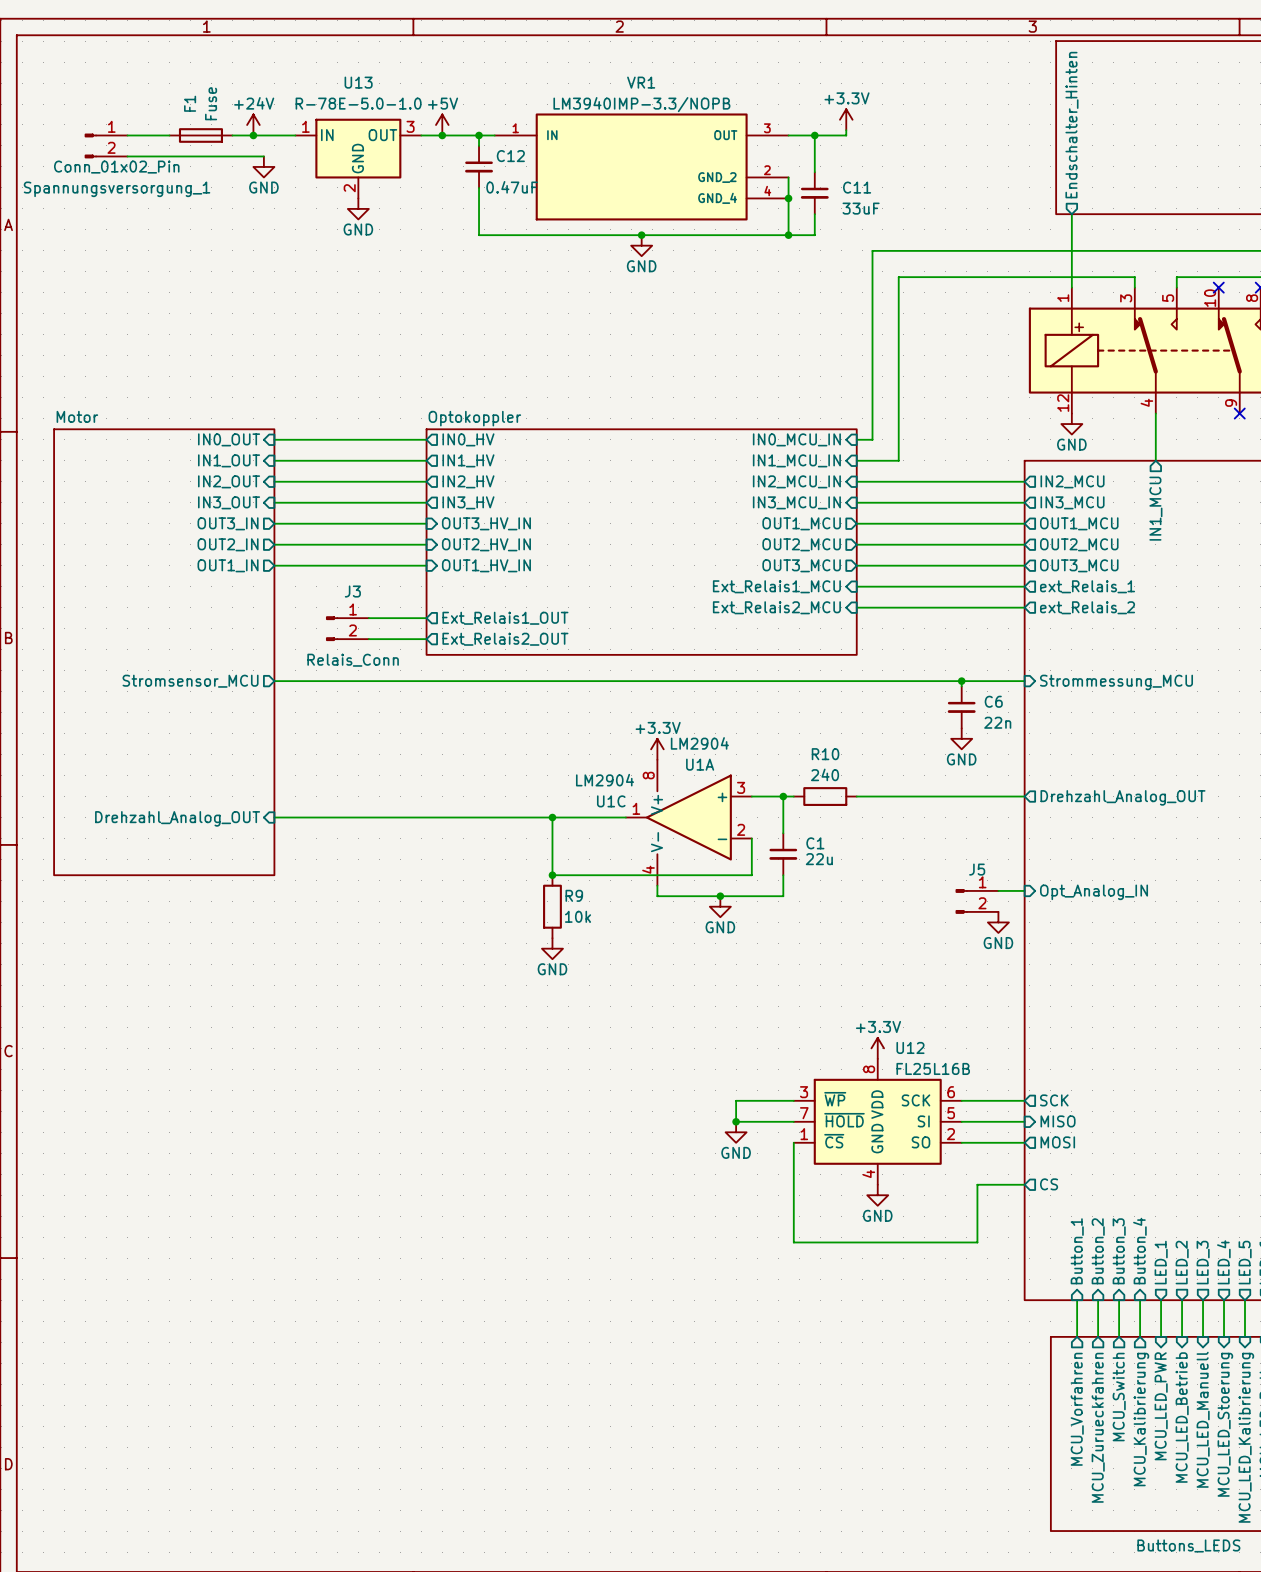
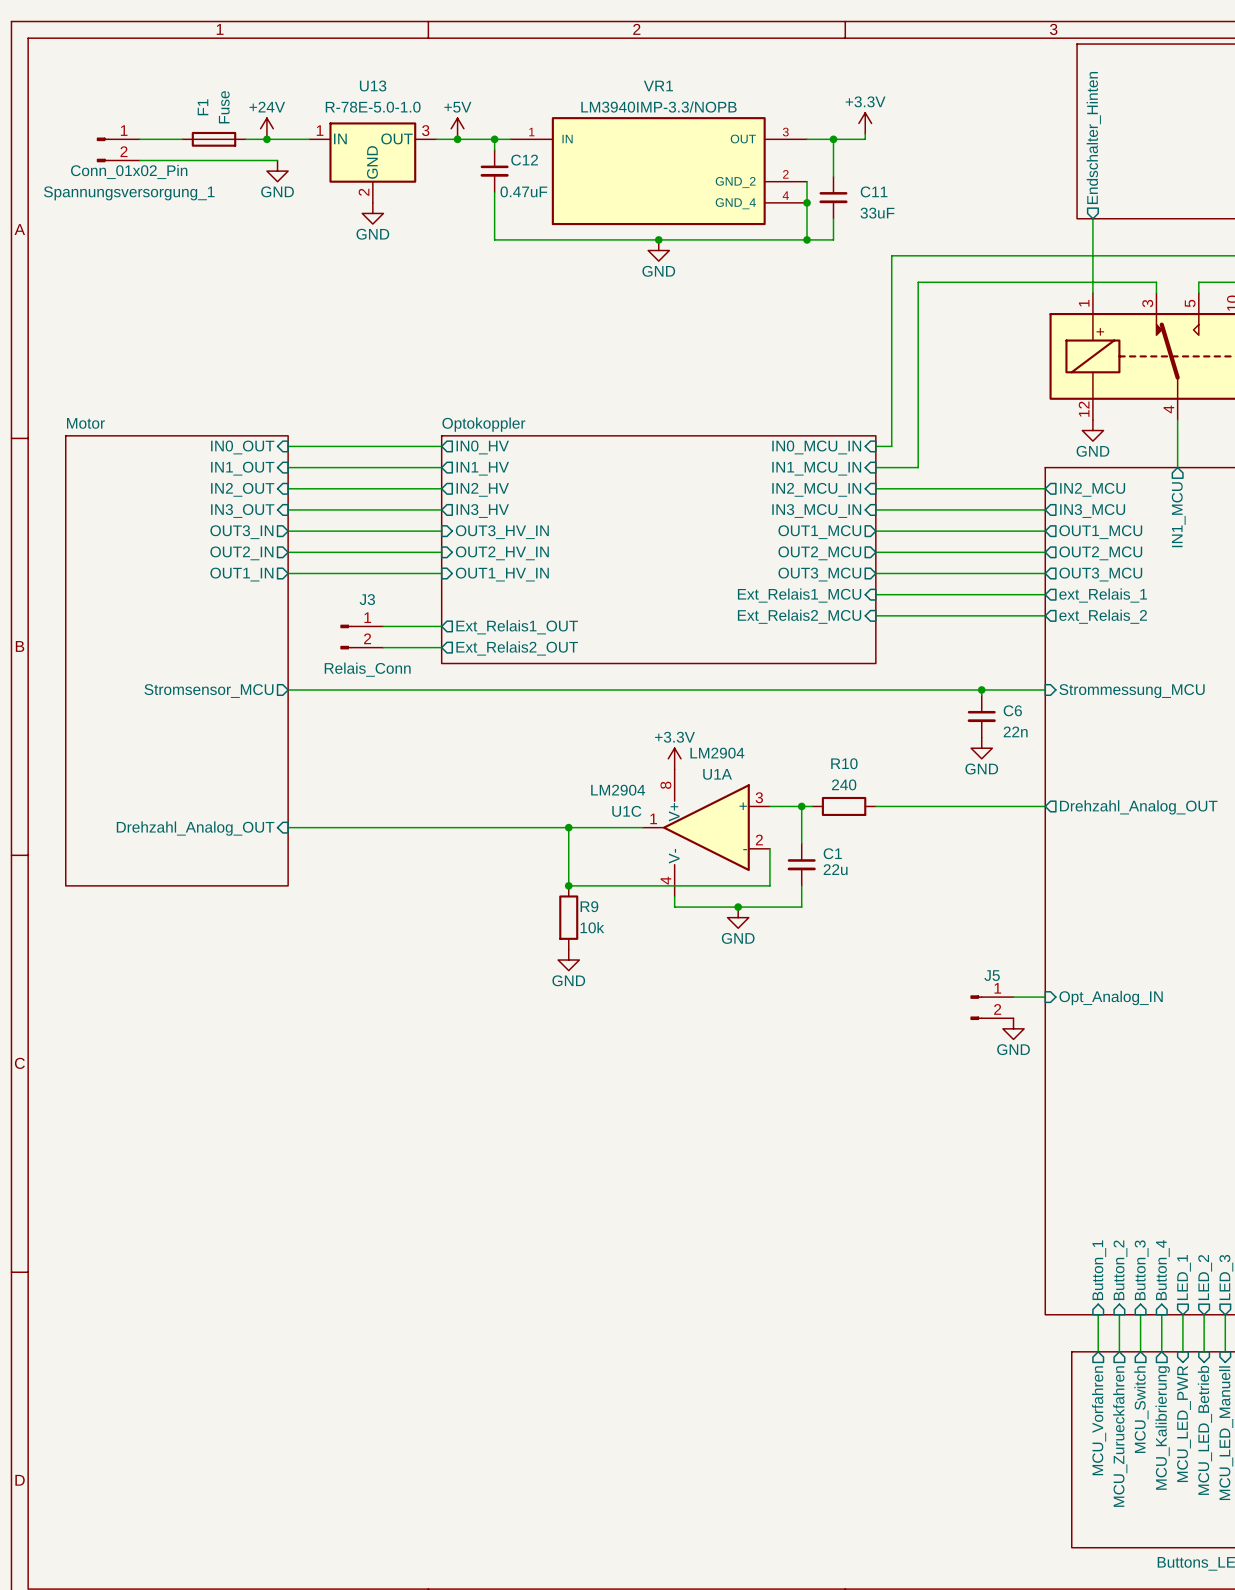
wire: (998, 890) (1024, 890) -> none
sheet pin position: Opt_Analog_IN (1094, 892) -> Opt_Analog_IN (1111, 998)
J5 position: (977, 901) -> (992, 1007)
power symbol position: GND (998, 922) -> GND (1013, 1028)
wire: none -> (1013, 997) (1045, 997)
power symbol: +3.3V (877, 1048) -> none
wire: (793, 1100) (736, 1100) (736, 1121) (793, 1121) -> none
wire: (961, 1100) (1024, 1100) -> none
sheet pin: SCK (1054, 1100) -> none
junction: (736, 1121) -> none
U12: FL25L16B (877, 1121) -> none
wire: (961, 1121) (1024, 1121) -> none
sheet pin: MISO (1058, 1121) -> none
power symbol: GND (736, 1132) -> none
wire: (793, 1142) (793, 1242) (977, 1242) (977, 1184) (1024, 1184) -> none
wire: (961, 1142) (1024, 1142) -> none
sheet pin: MOSI (1057, 1142) -> none
sheet pin: CS (1049, 1184) -> none
power symbol: GND (877, 1195) -> none

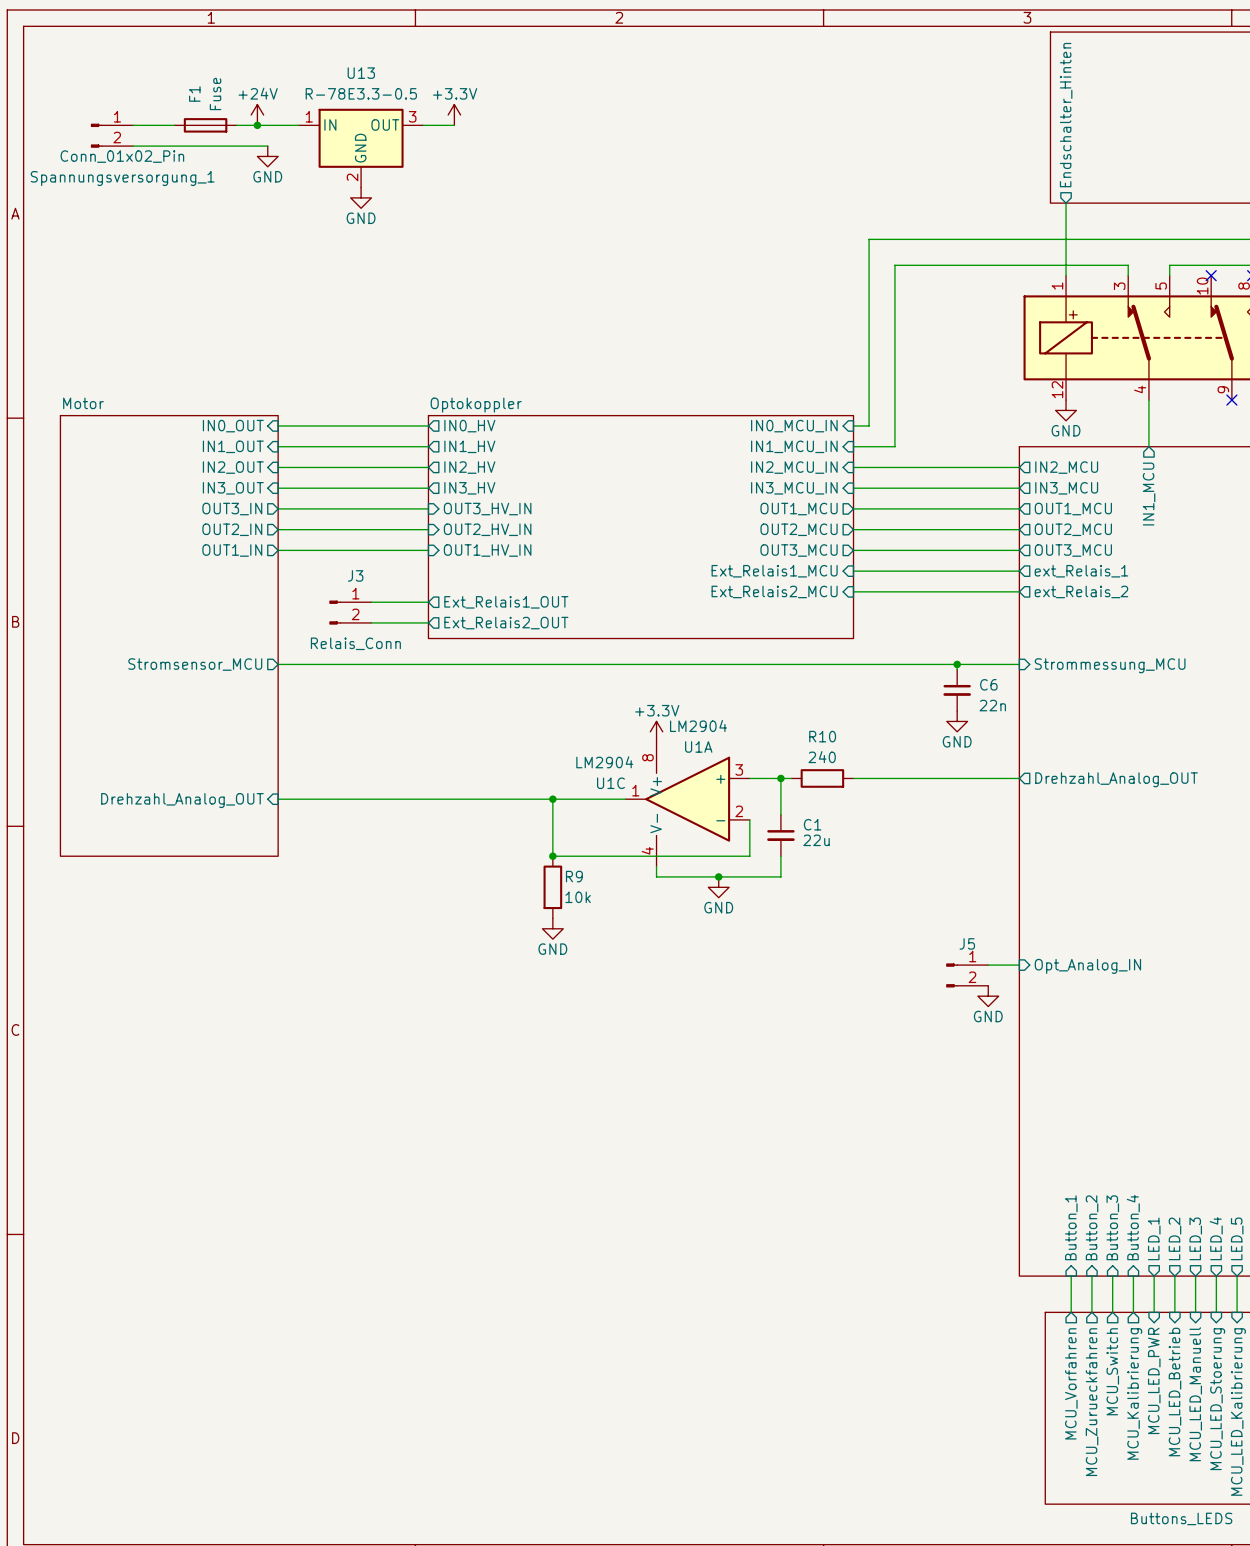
U13 value: R-78E-5.0-1.0 (373, 107) -> R-78E3.3-0.5 (361, 93)
power symbol: +3.3V (865, 123) -> none
power symbol: +5V (457, 128) -> none
power symbol: none -> +3.3V (454, 114)
wire: (865, 134) (865, 139) (807, 139) -> none
junction: (457, 139) -> none
wire: (468, 139) (510, 139) -> none
wire: (494, 139) (494, 149) -> none
junction: (494, 139) -> none
wire: (833, 139) (833, 176) -> none
junction: (833, 139) -> none
C12: 0.47uF (494, 171) -> none
VR1: LM3940IMP-3.3/NOPB (658, 171) -> none
wire: (807, 181) (807, 239) -> none
wire: (494, 192) (494, 239) (833, 239) (833, 218) -> none
C11: 33uF (833, 197) -> none
junction: (807, 202) -> none
junction: (658, 239) -> none
junction: (807, 239) -> none
power symbol: GND (658, 250) -> none

